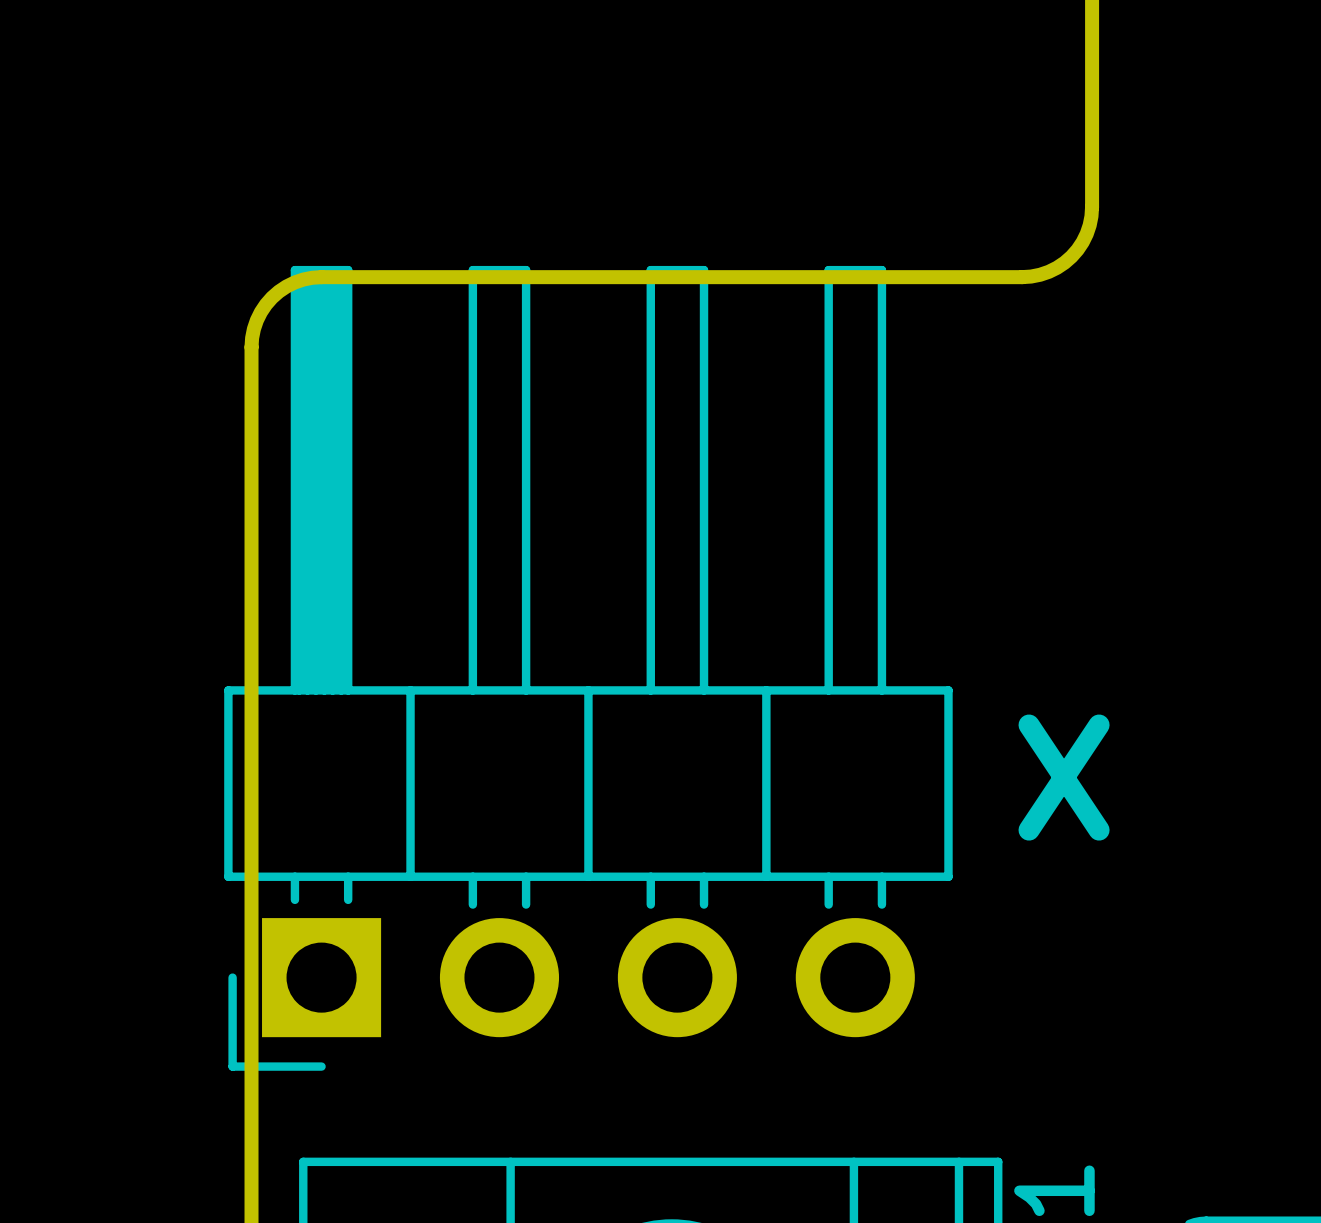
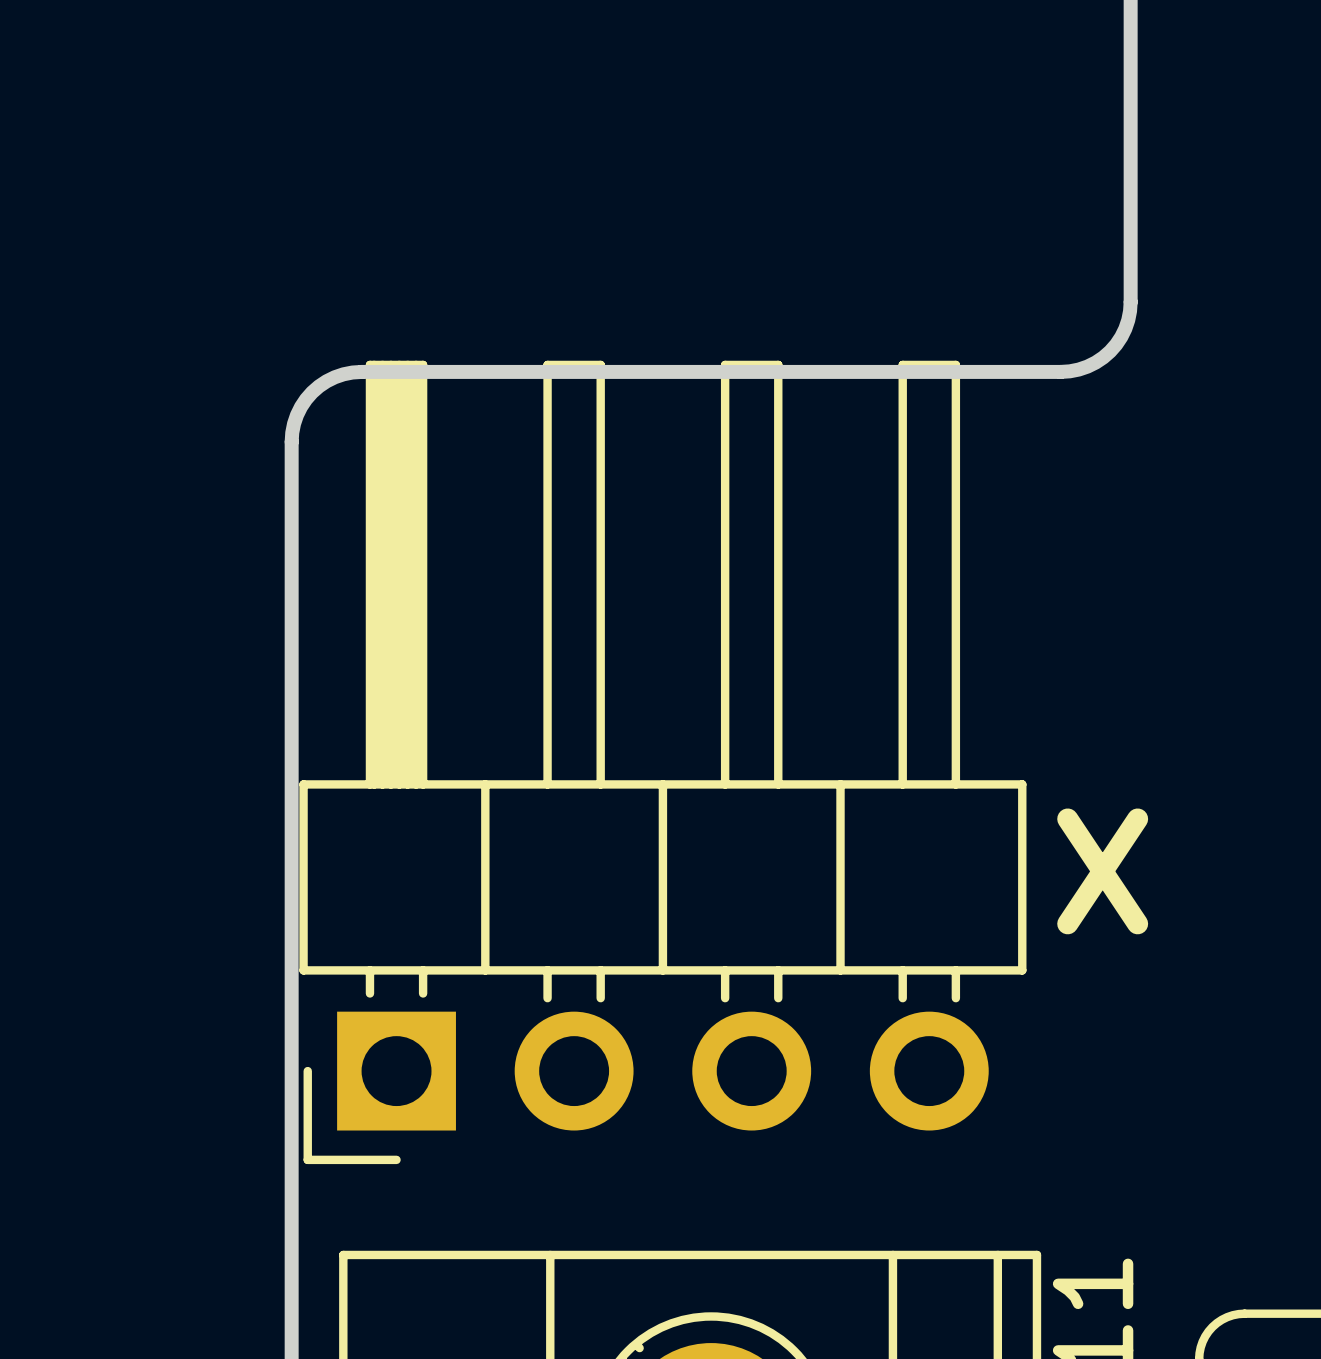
part position: (588, 668) -> (662, 762)

